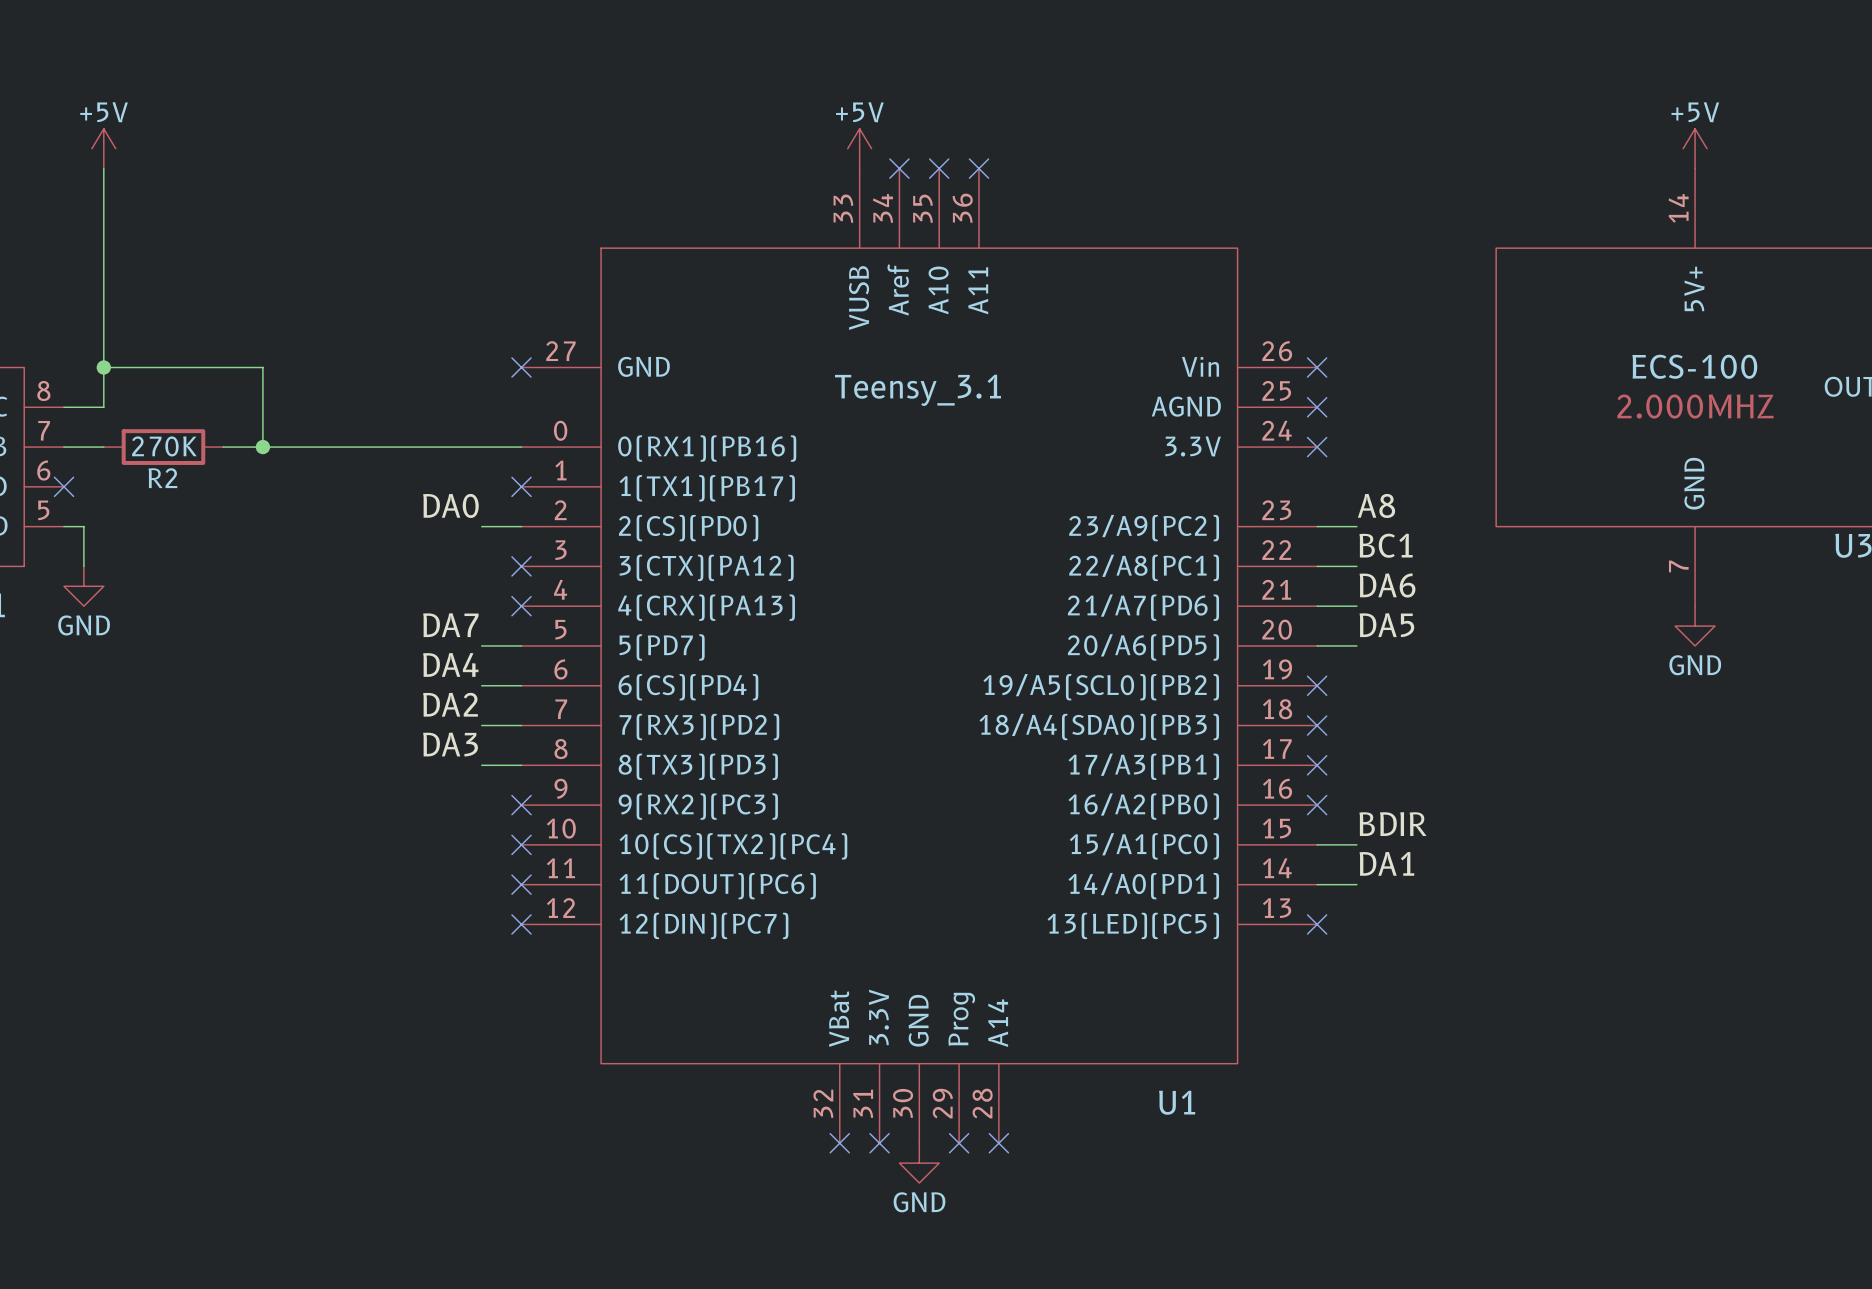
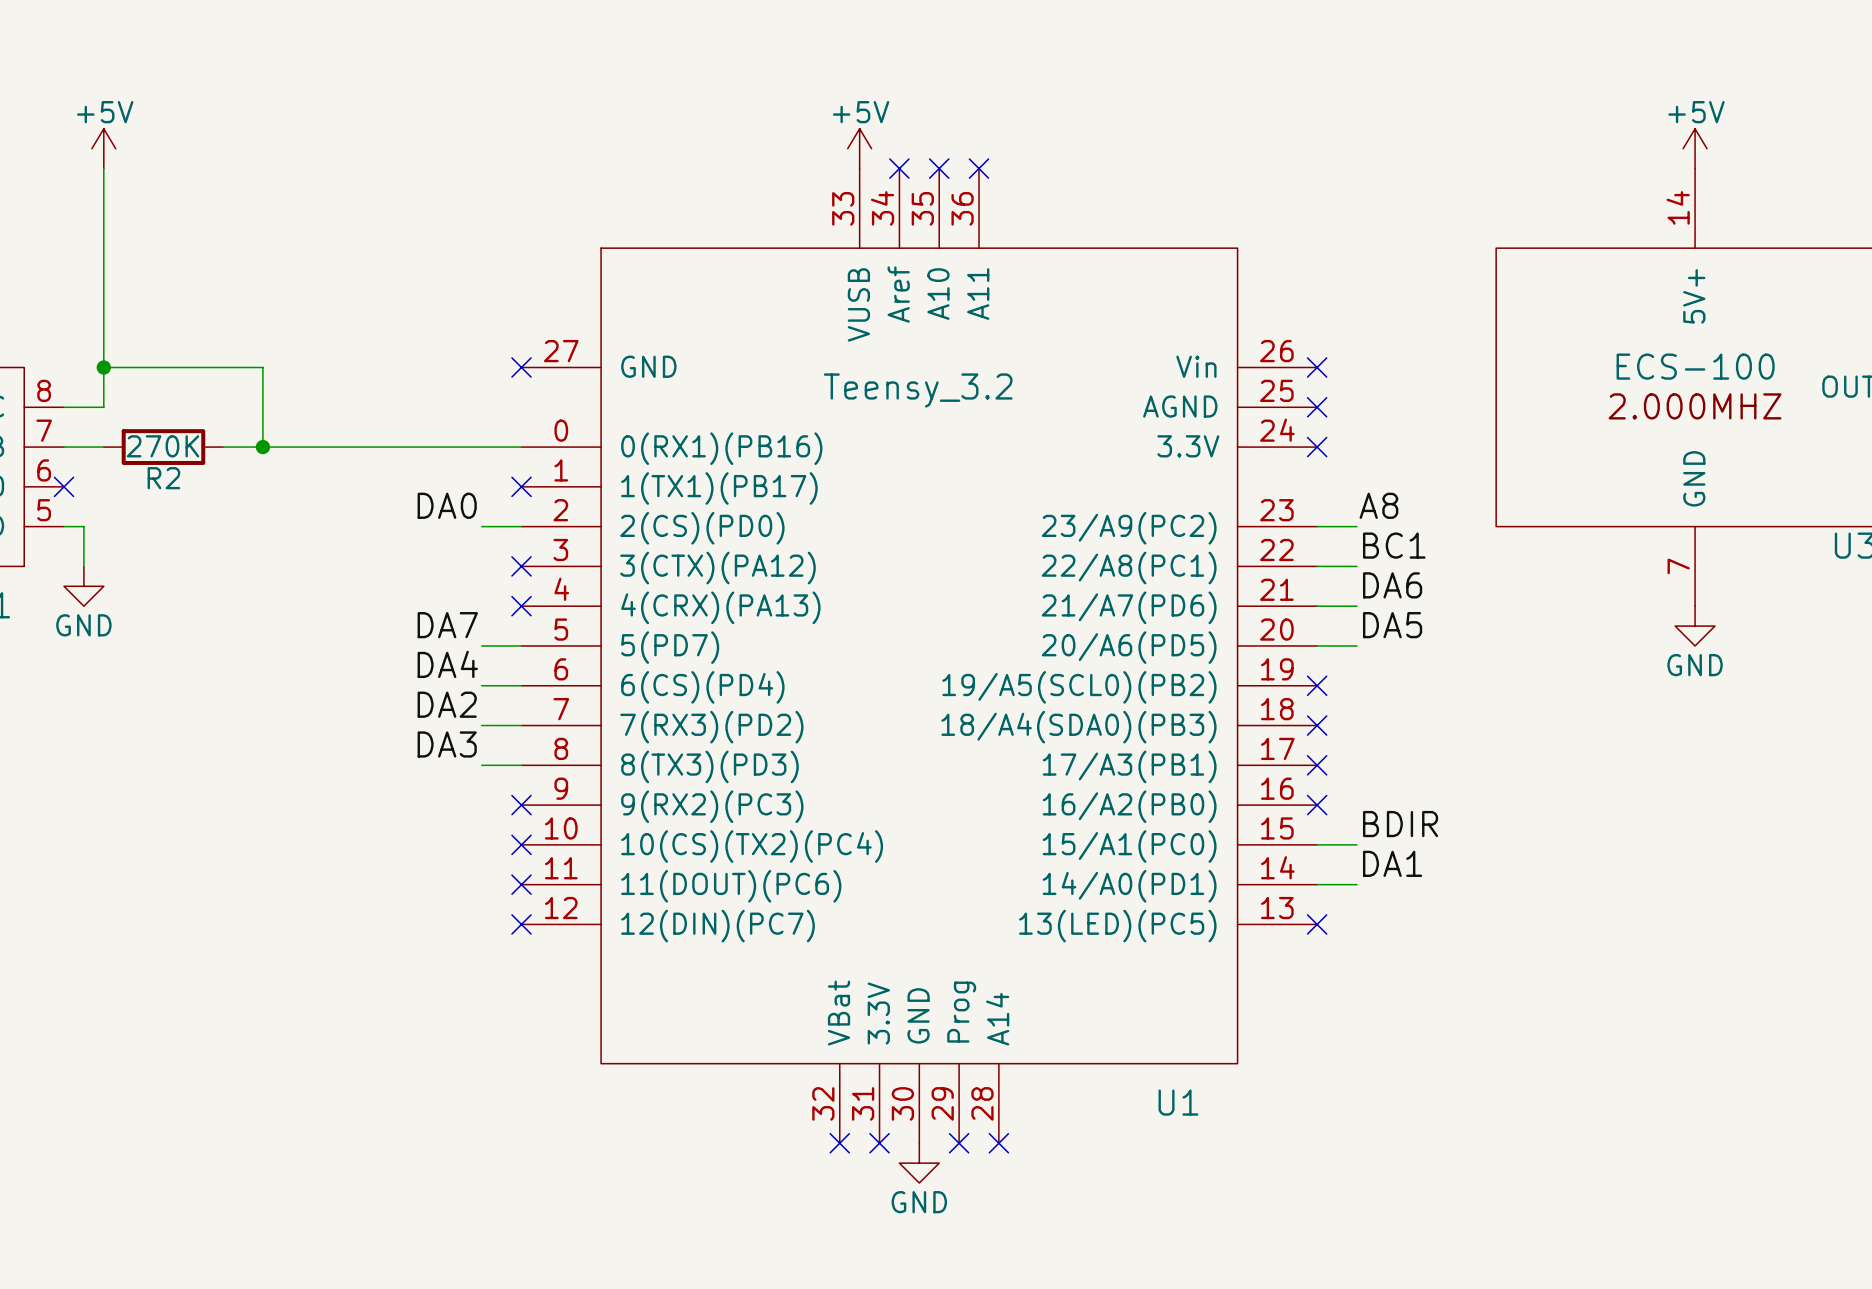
U1 value: Teensy_3.1 (917, 390) -> Teensy_3.2 (918, 390)

